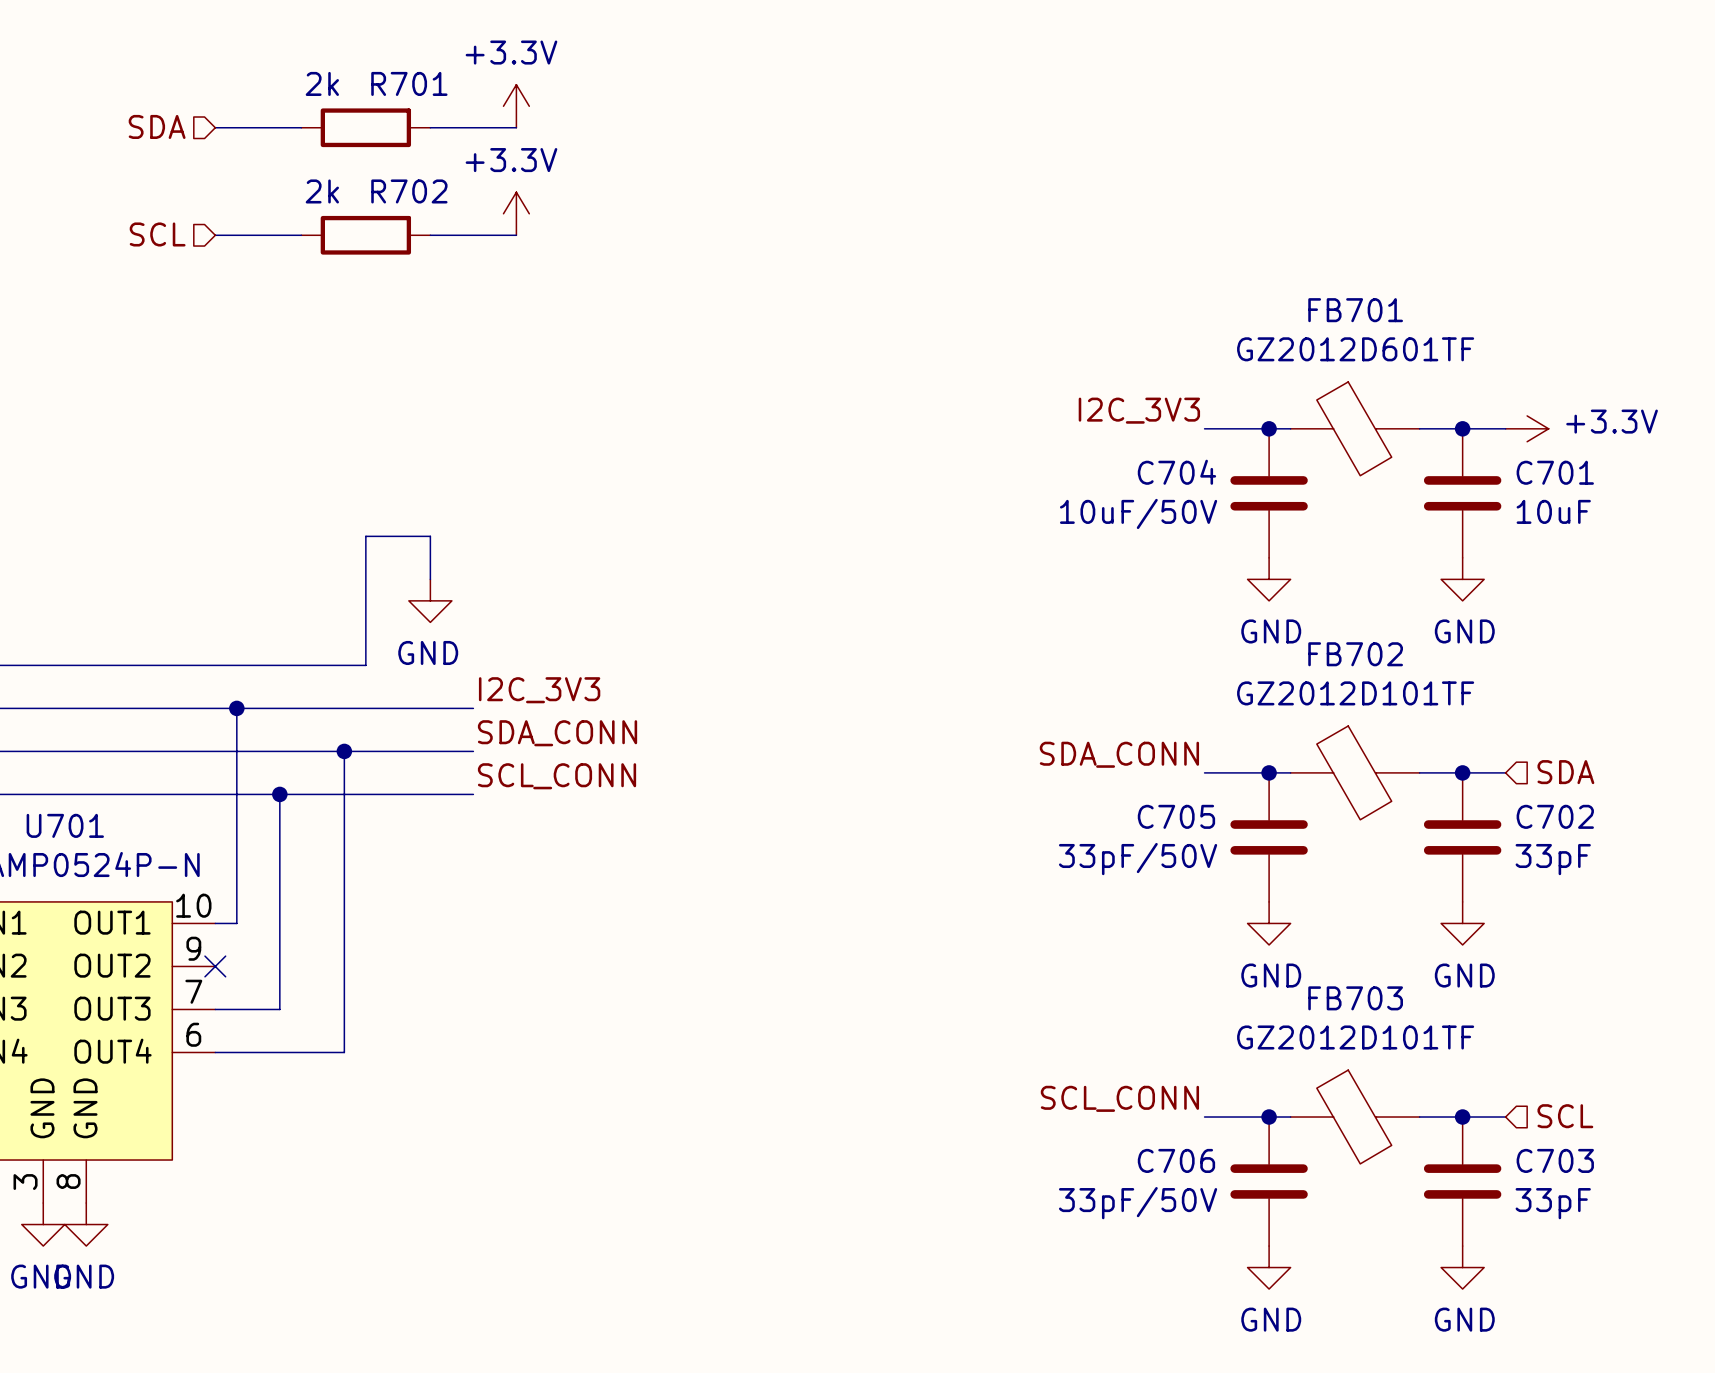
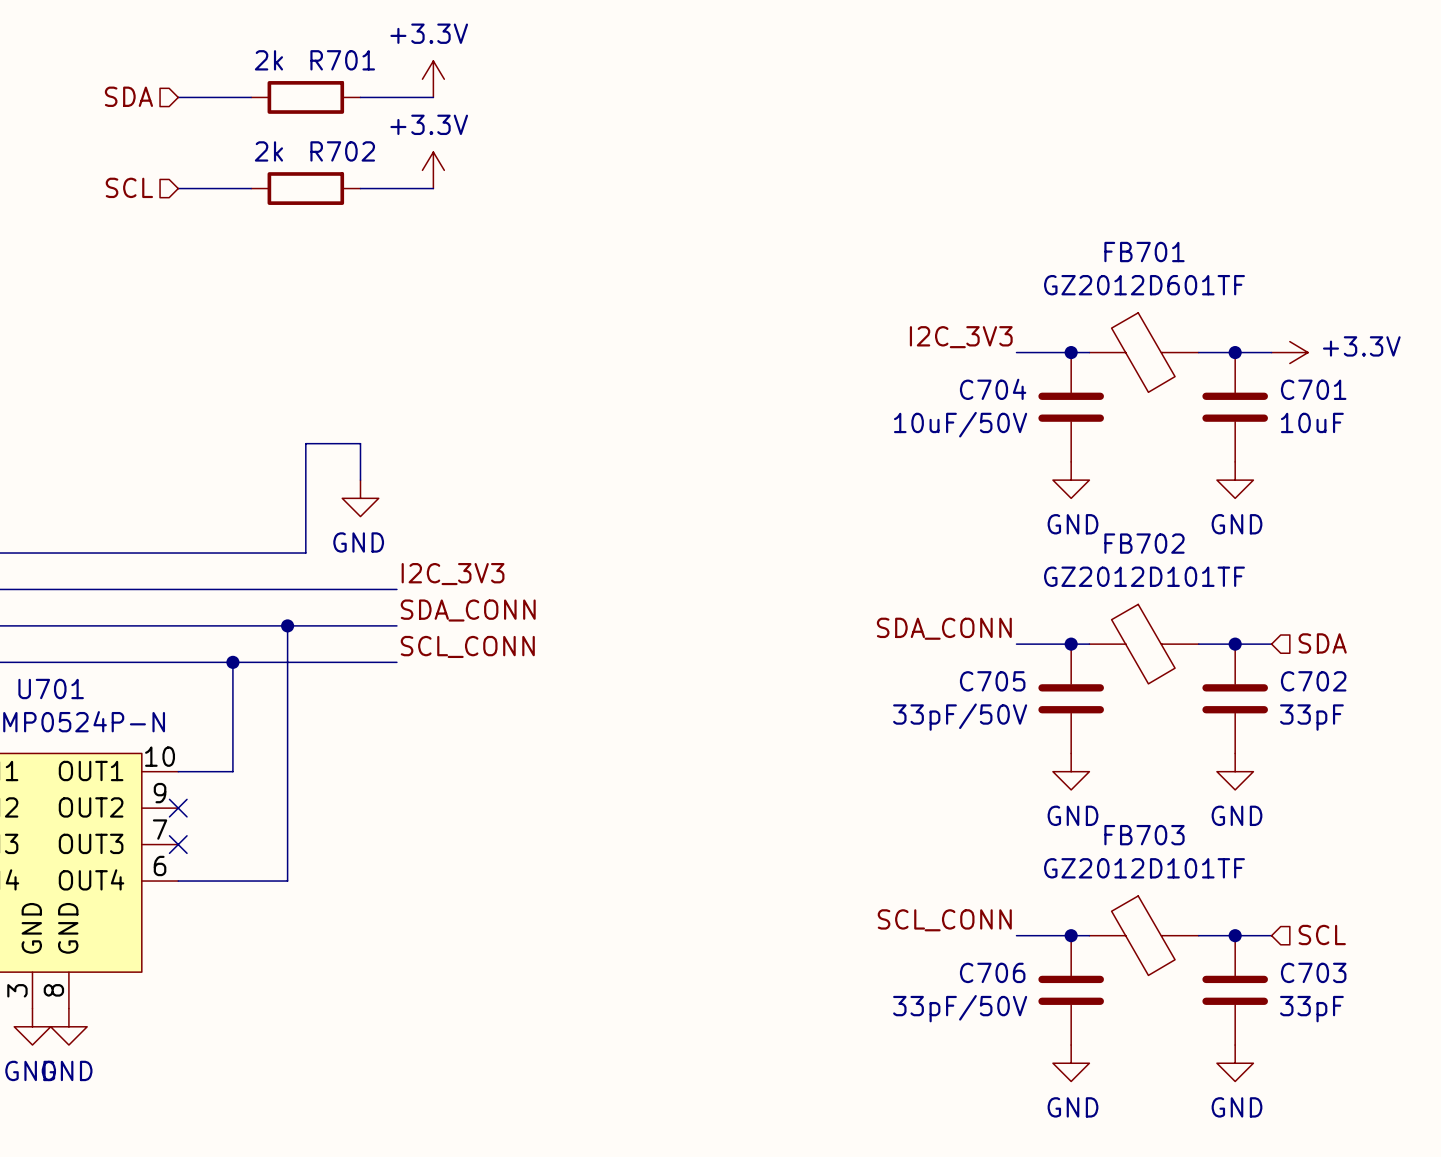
wire: (236, 708) (236, 923) -> none
junction: (236, 708) -> none
wire: (279, 923) (279, 1009) (215, 1009) -> (232, 771) (196, 771)
no-connect mark: none -> (178, 844)

